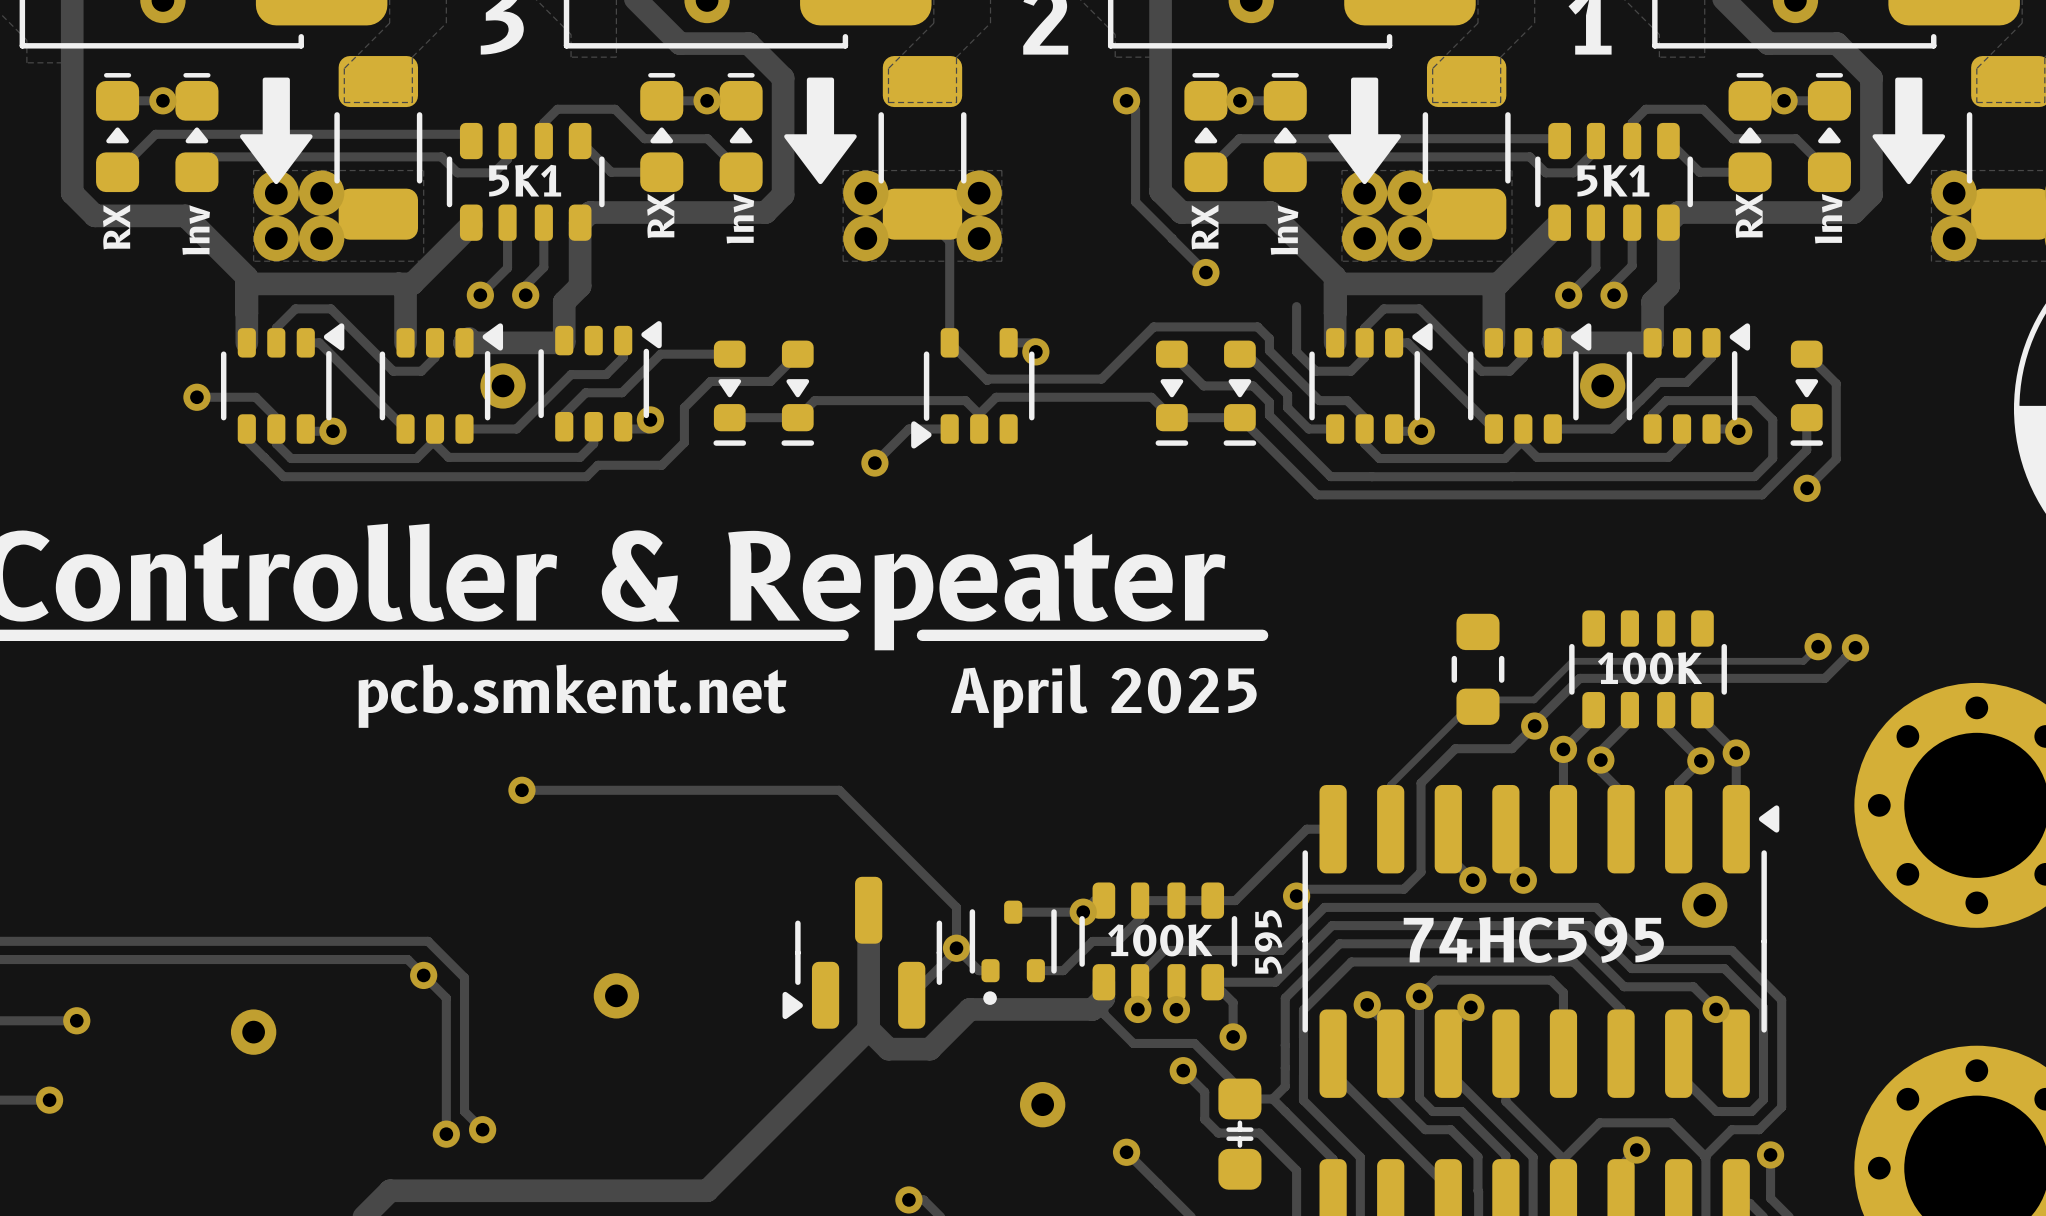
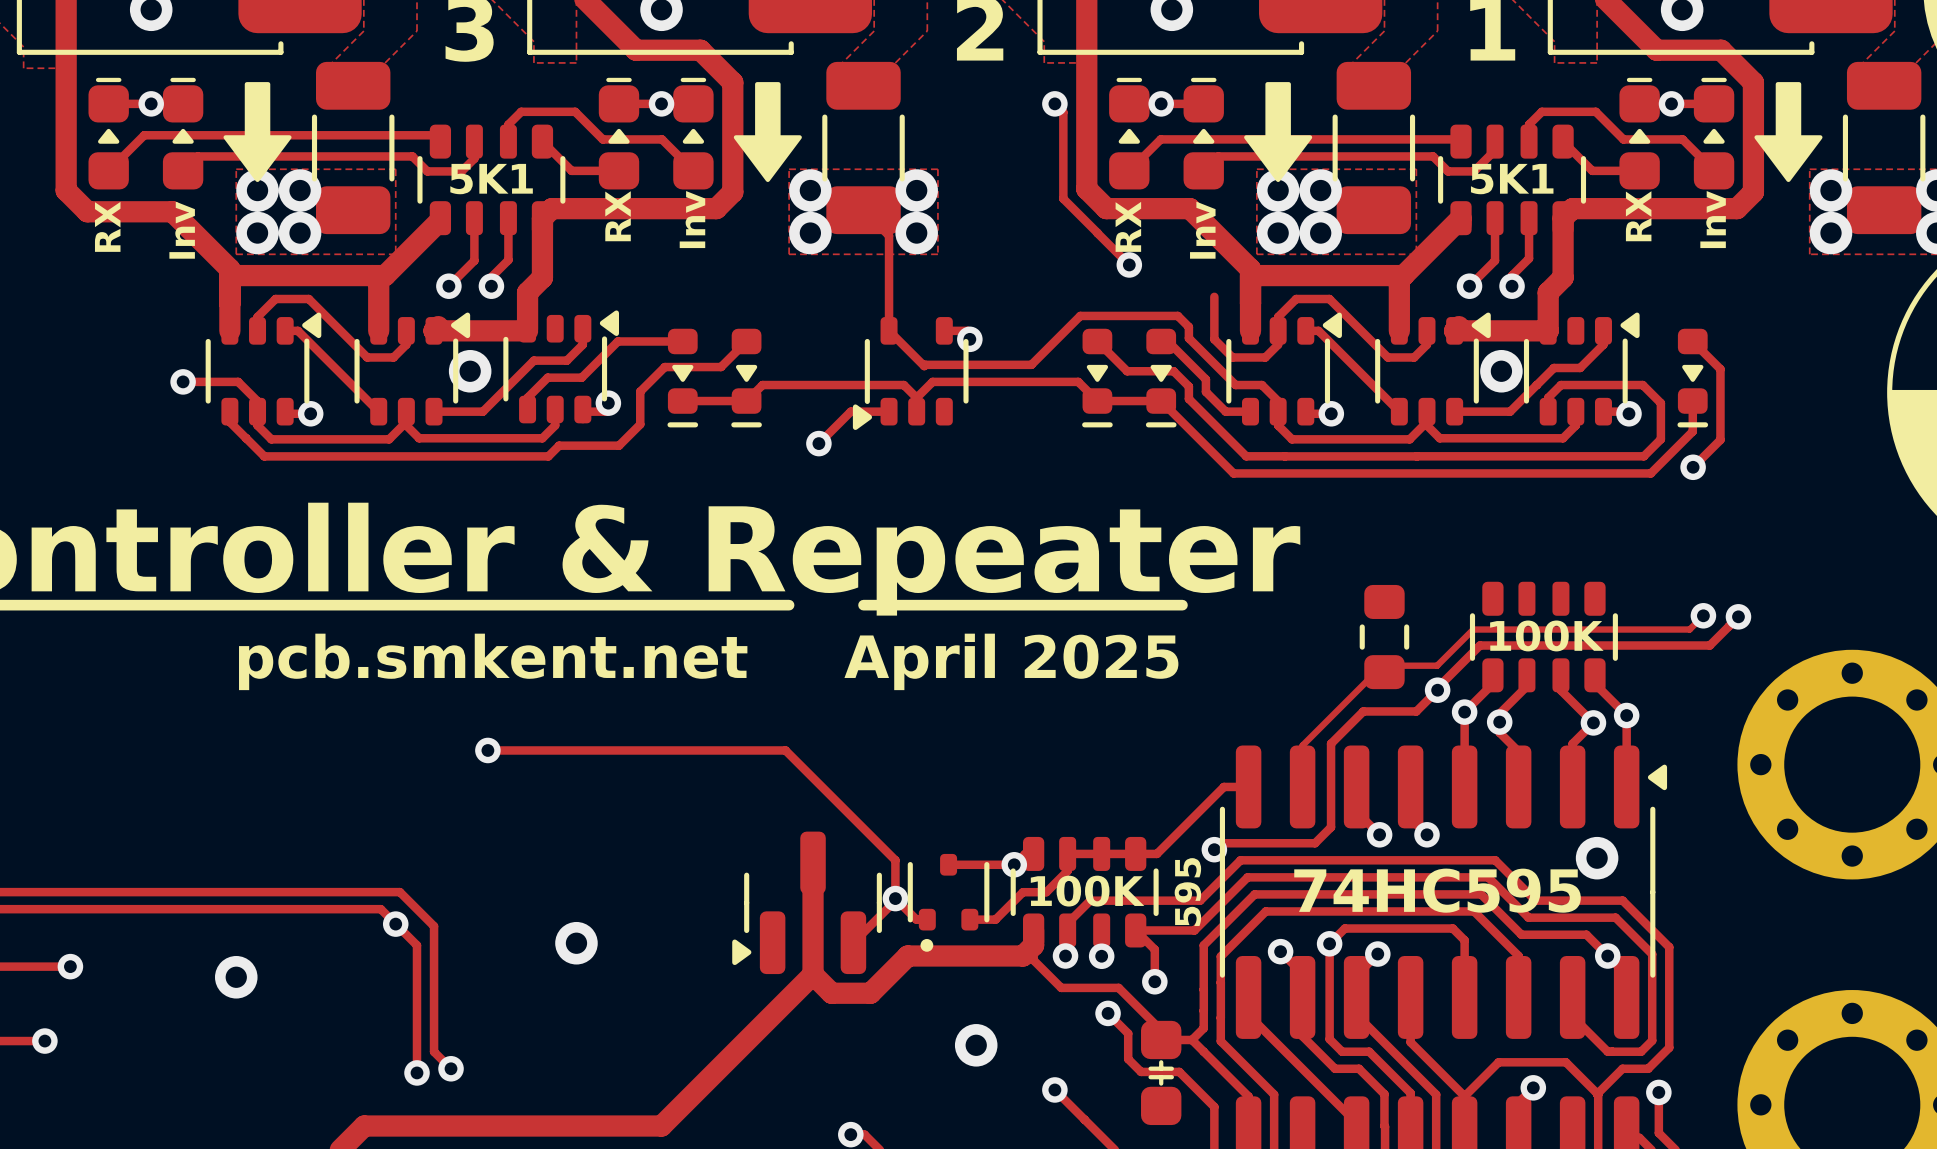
text position: pcb.smkent.net (572, 696) -> pcb.smkent.net (493, 661)

